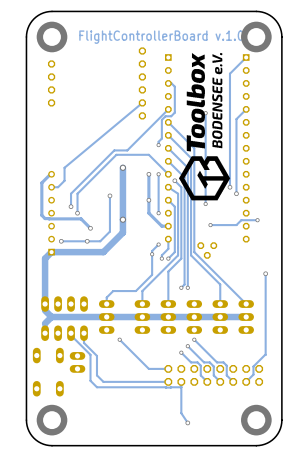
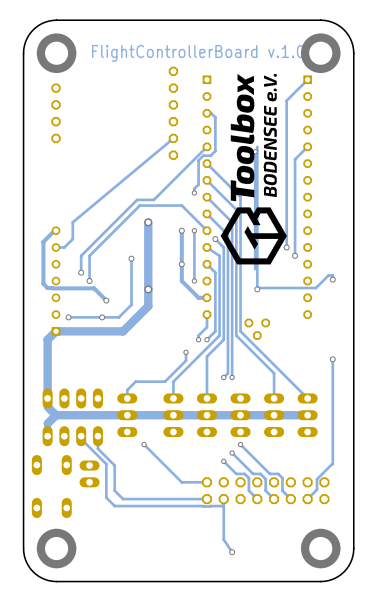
track: none -> (257, 146) (257, 289) (316, 288) (328, 275) (332, 275) (332, 279)
via: (205, 203) -> none
via: none -> (332, 279)
via: none -> (257, 289)
track: (257, 220) (241, 220) (236, 225) (210, 225) -> none
via: (257, 220) -> none
via: (210, 225) -> none
track: (158, 244) (152, 251) (152, 268) -> none
via: (158, 244) -> none
via: (152, 254) -> none
via: none -> (186, 352)

